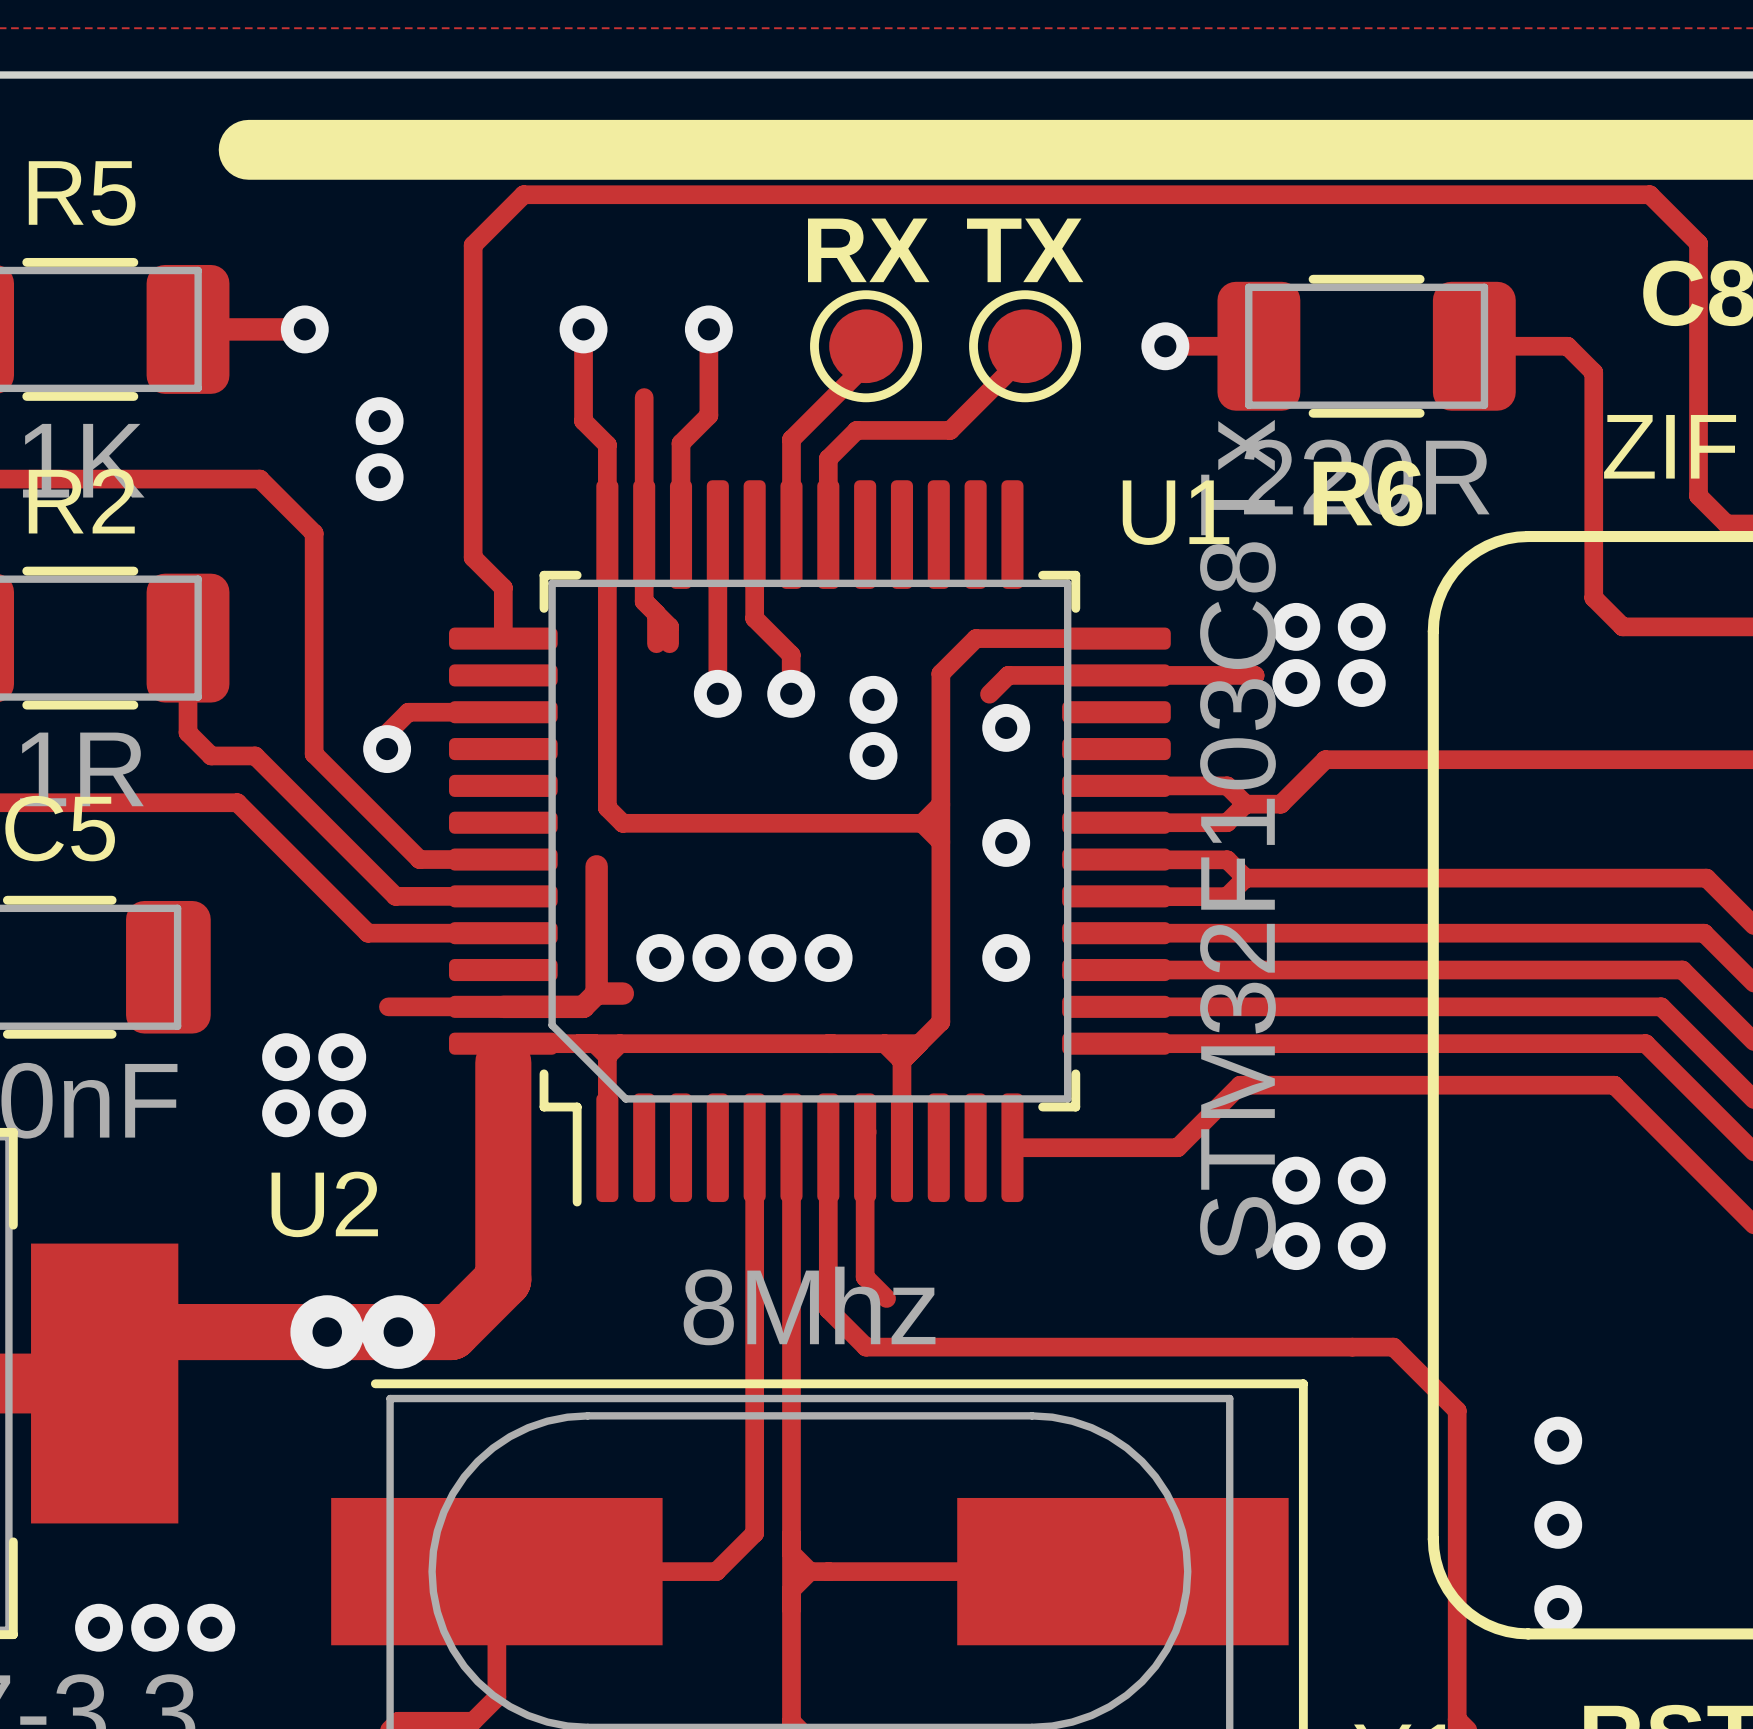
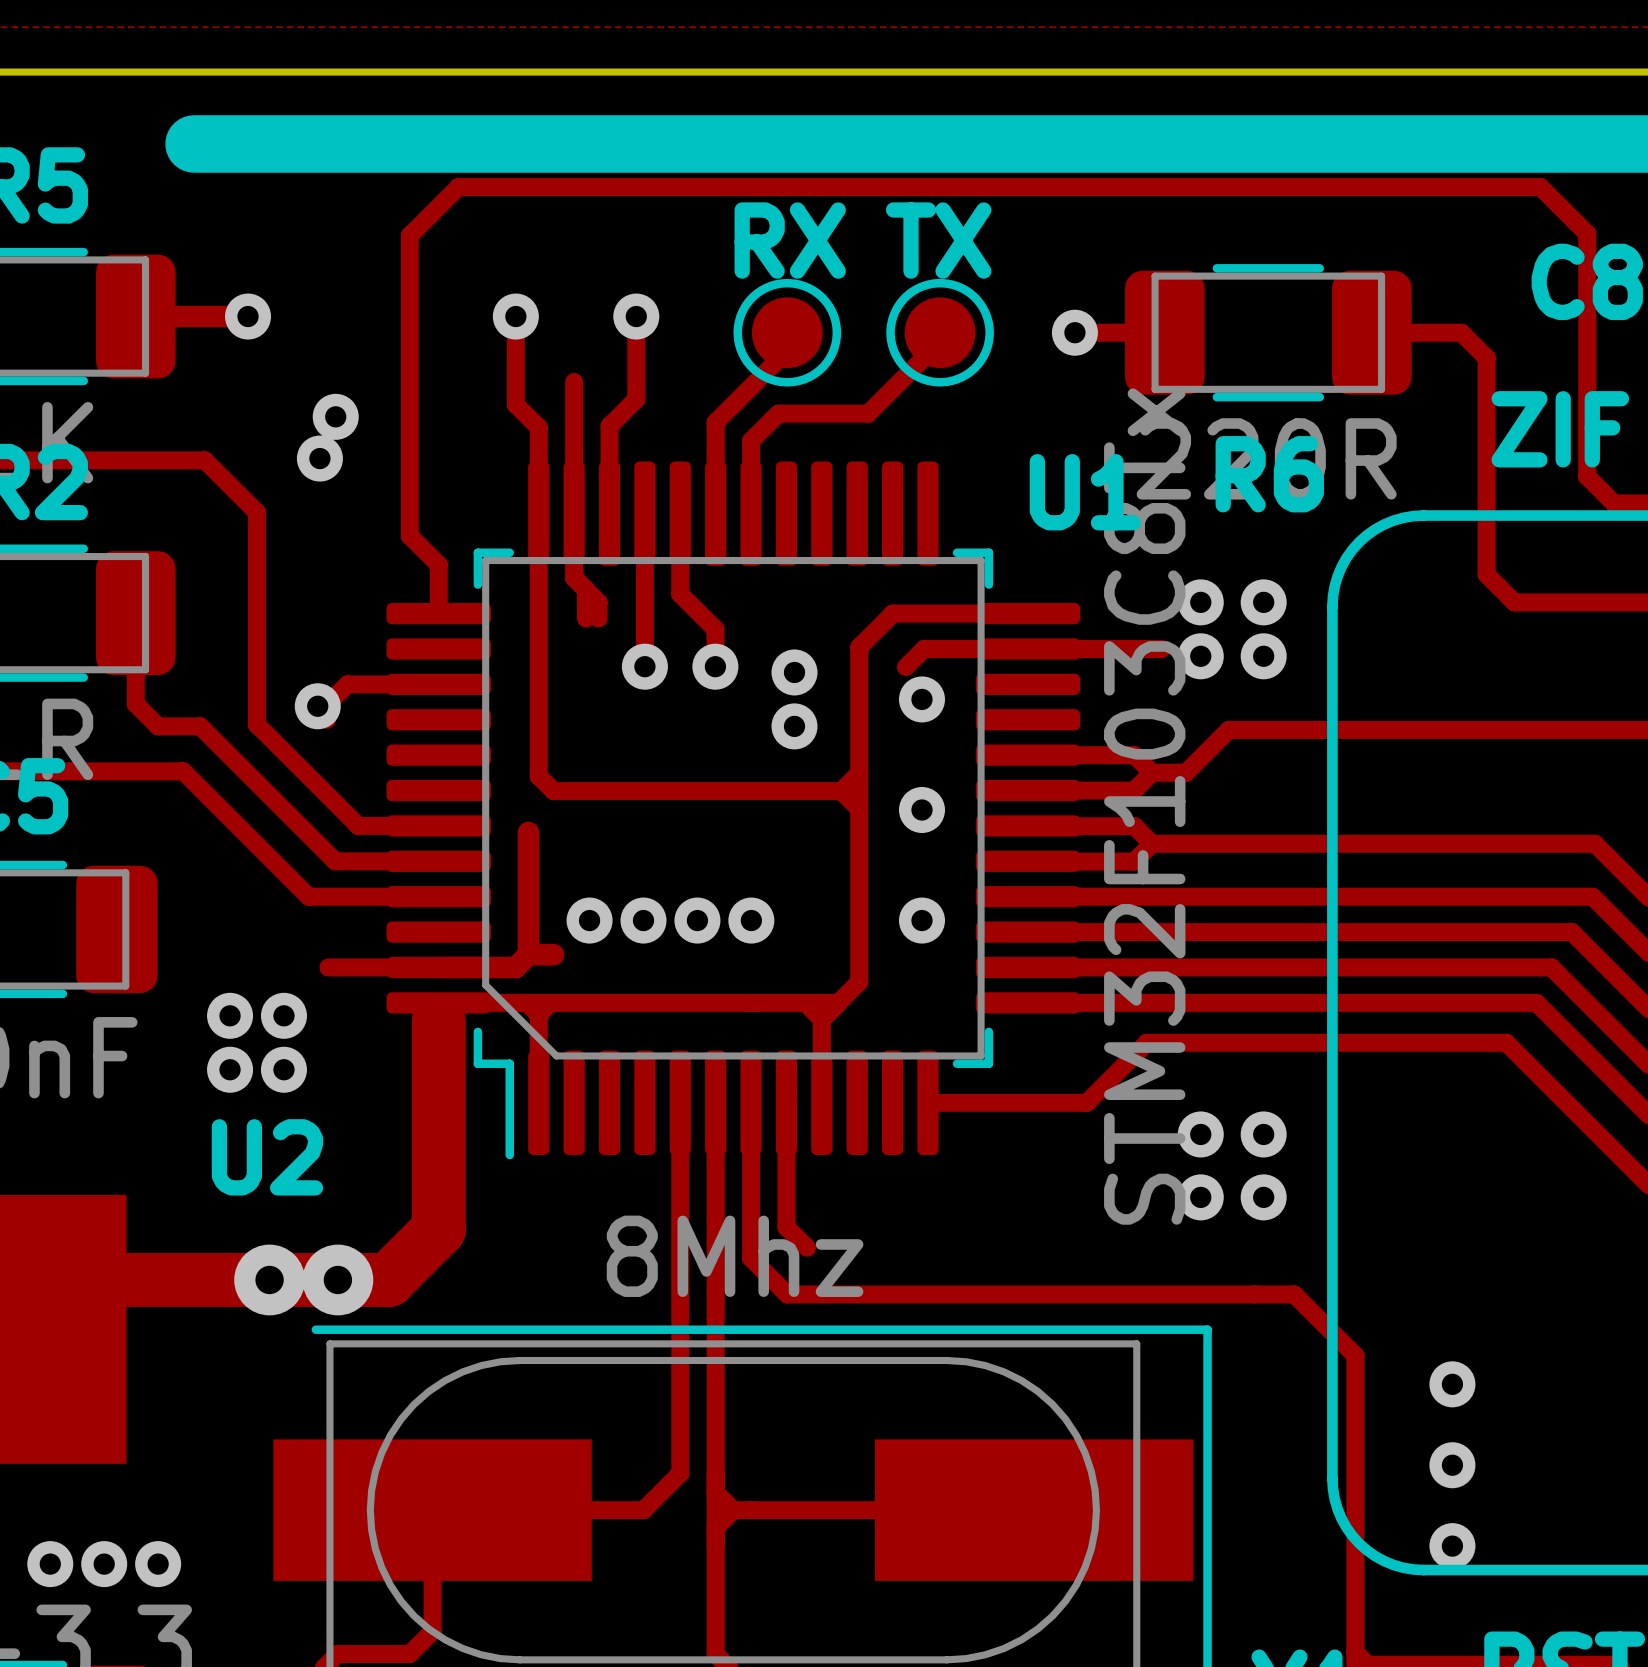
via position: (379, 421) -> (335, 416)
via position: (387, 749) -> (317, 706)

